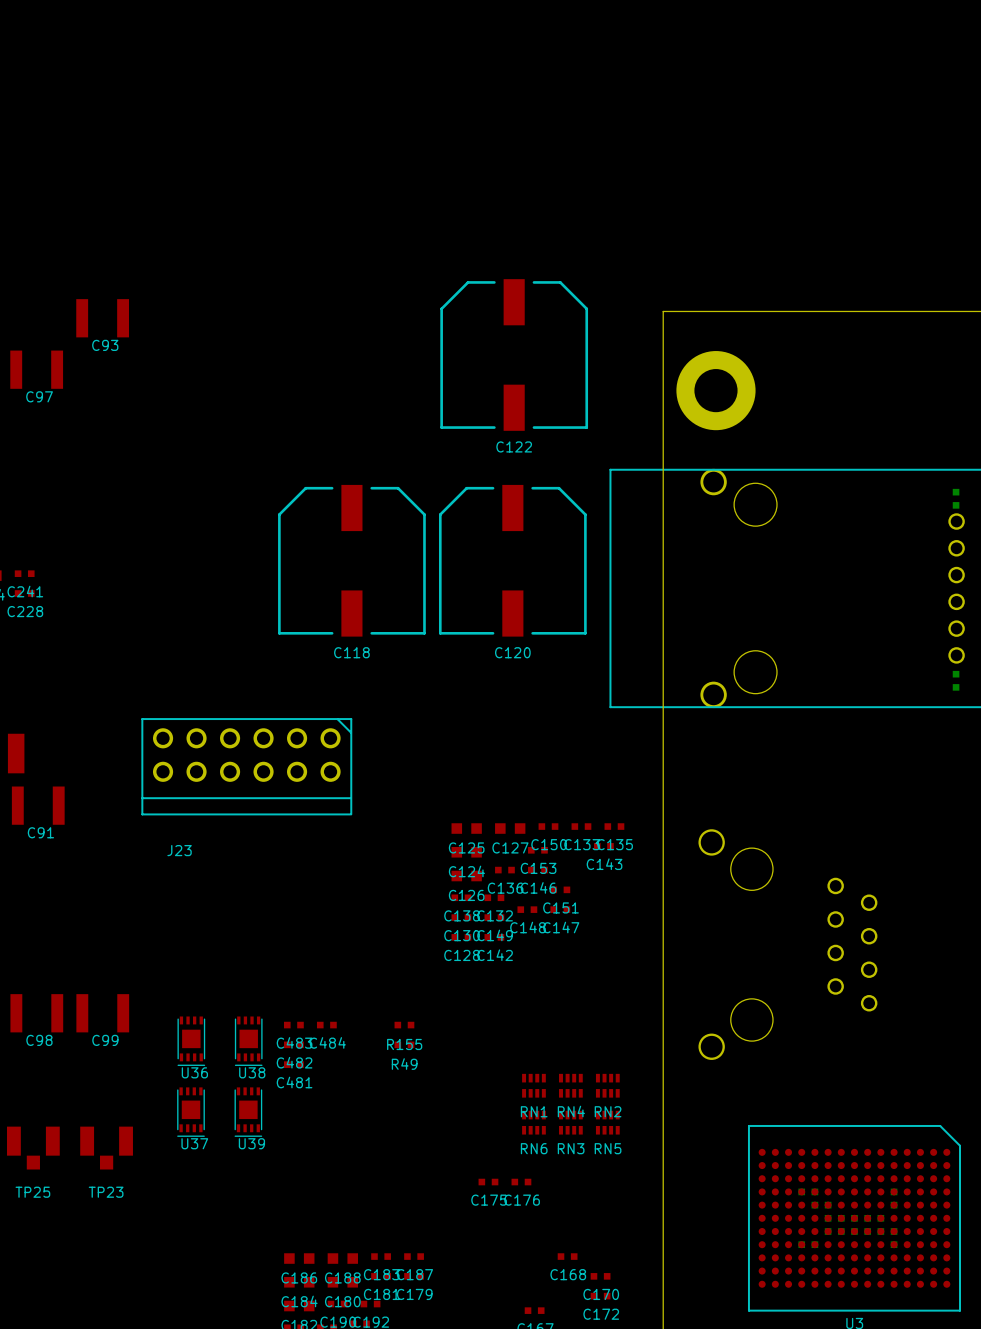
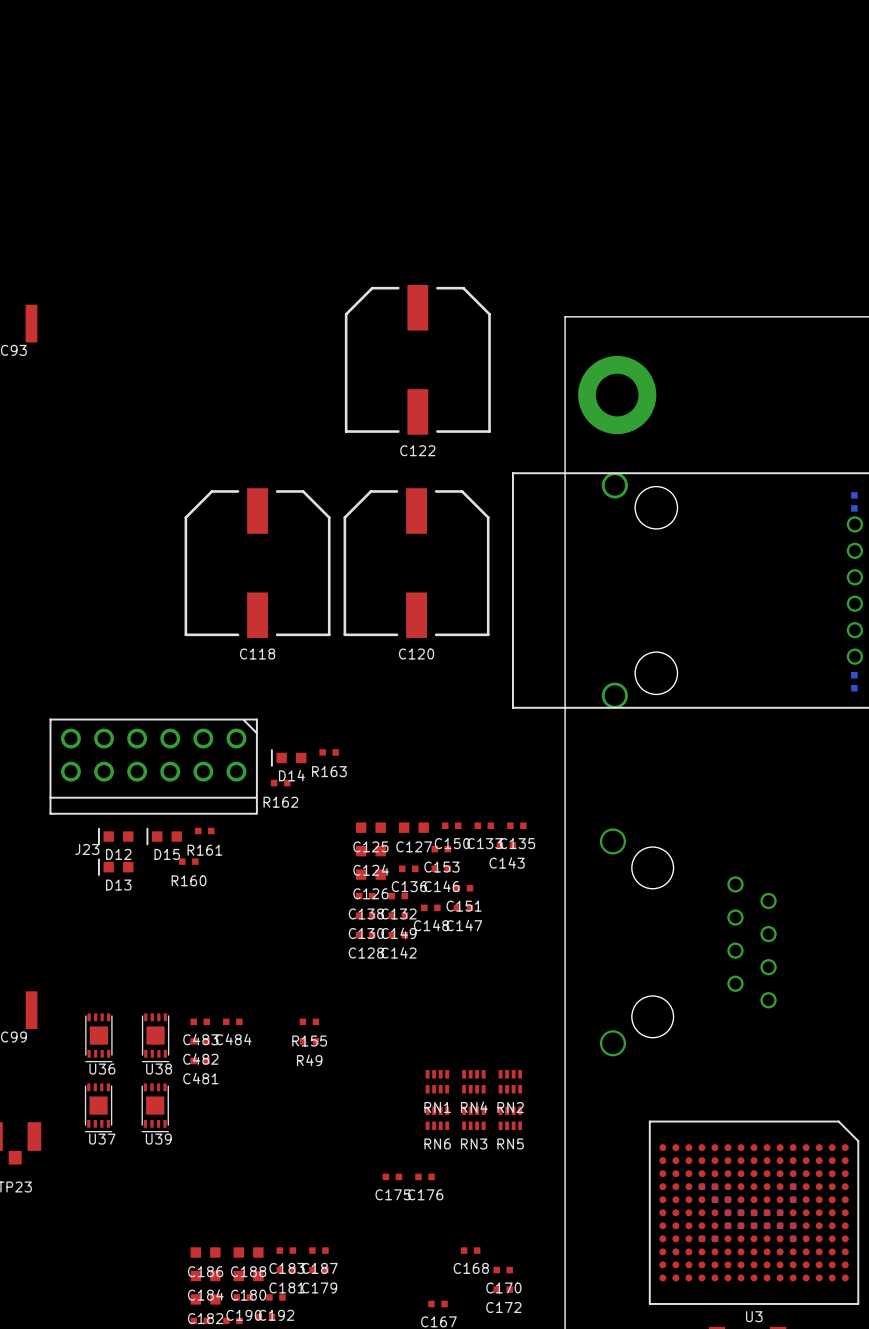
R163: none -> (329, 752)
D14: none -> (288, 757)
R162: none -> (280, 783)
R161: none -> (204, 831)
D12: none -> (115, 836)
D15: none -> (164, 836)
R160: none -> (188, 861)
D13: none -> (115, 867)

